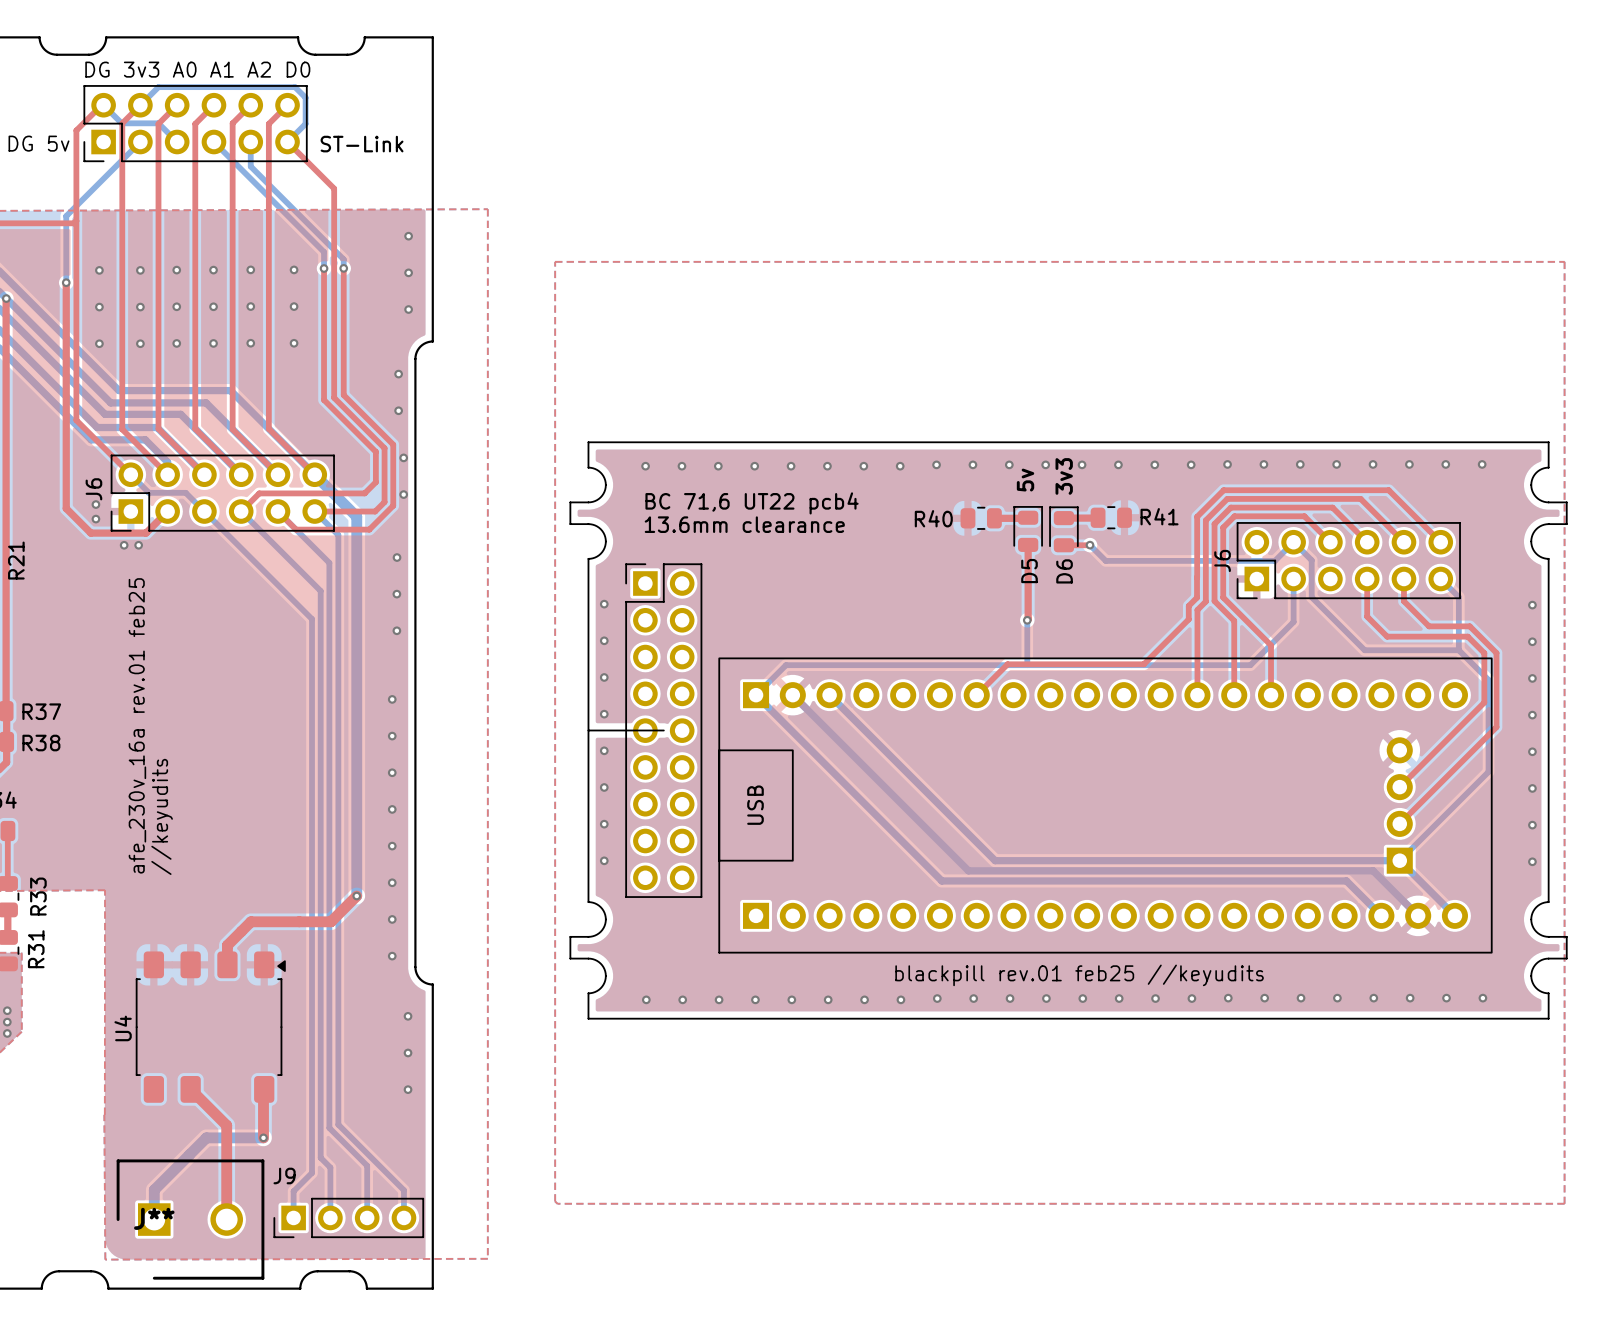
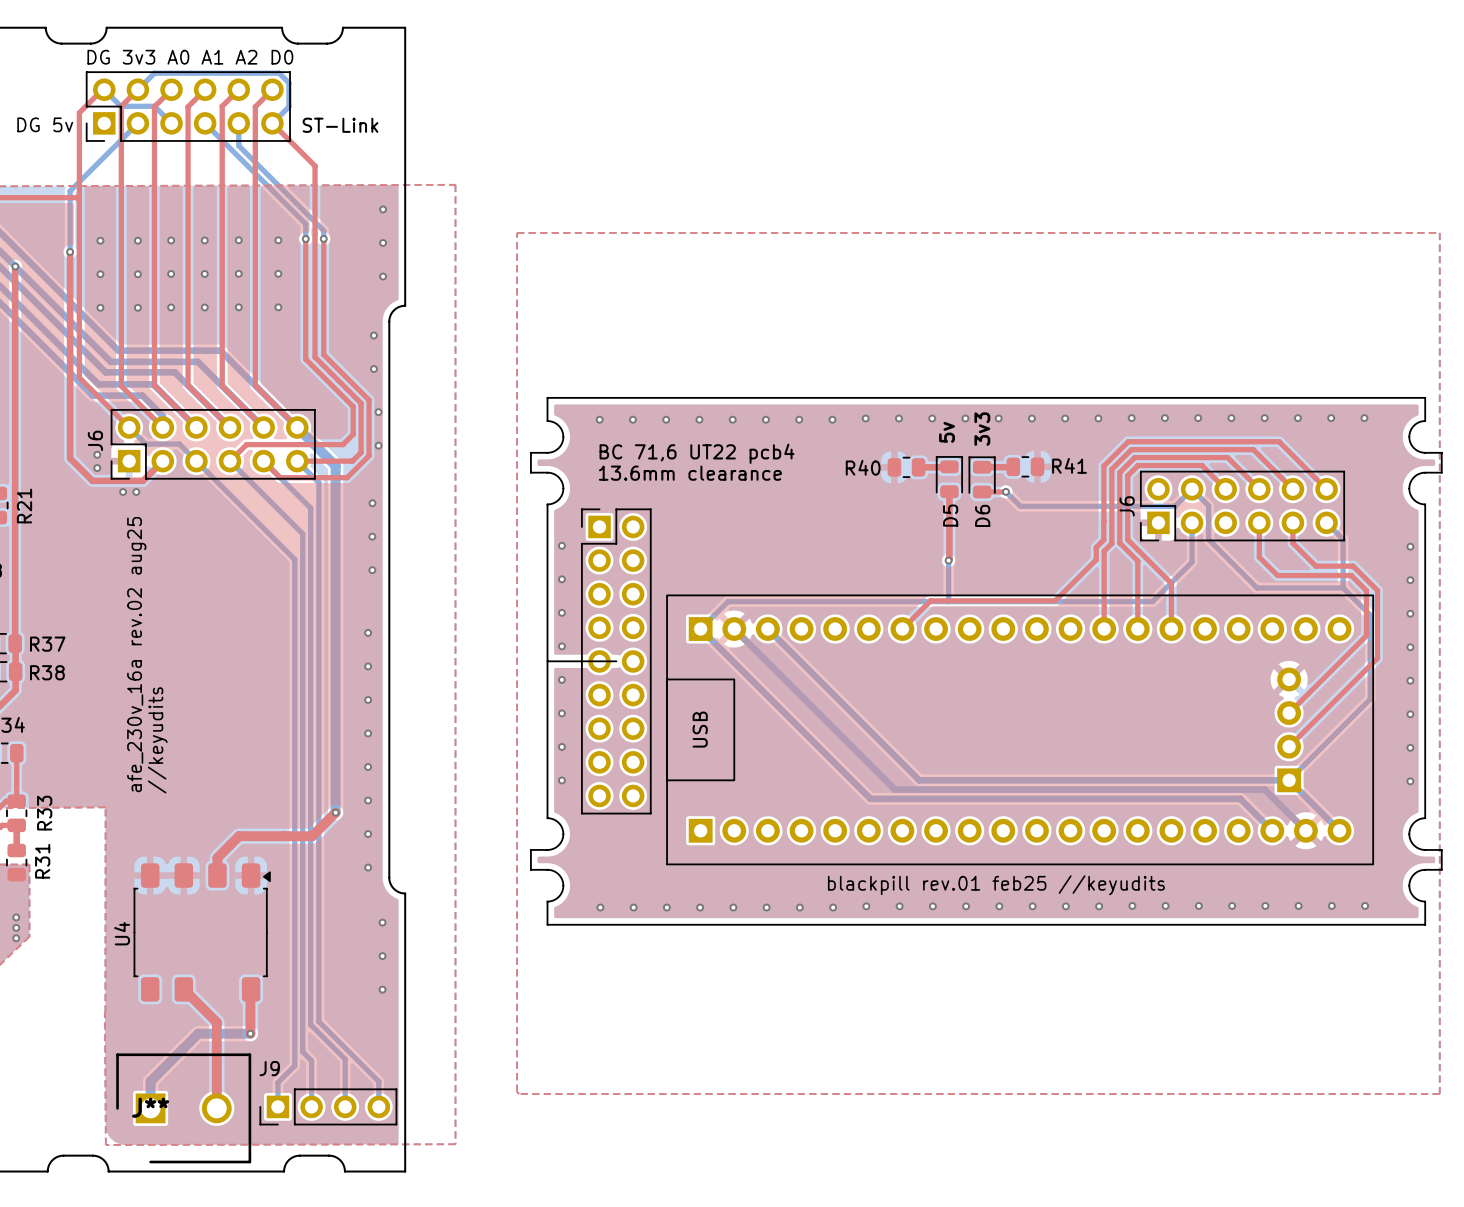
text: afe_230v_16a rev.01 feb25 (137, 725) -> afe_230v_16a rev.02 aug25 (136, 654)

